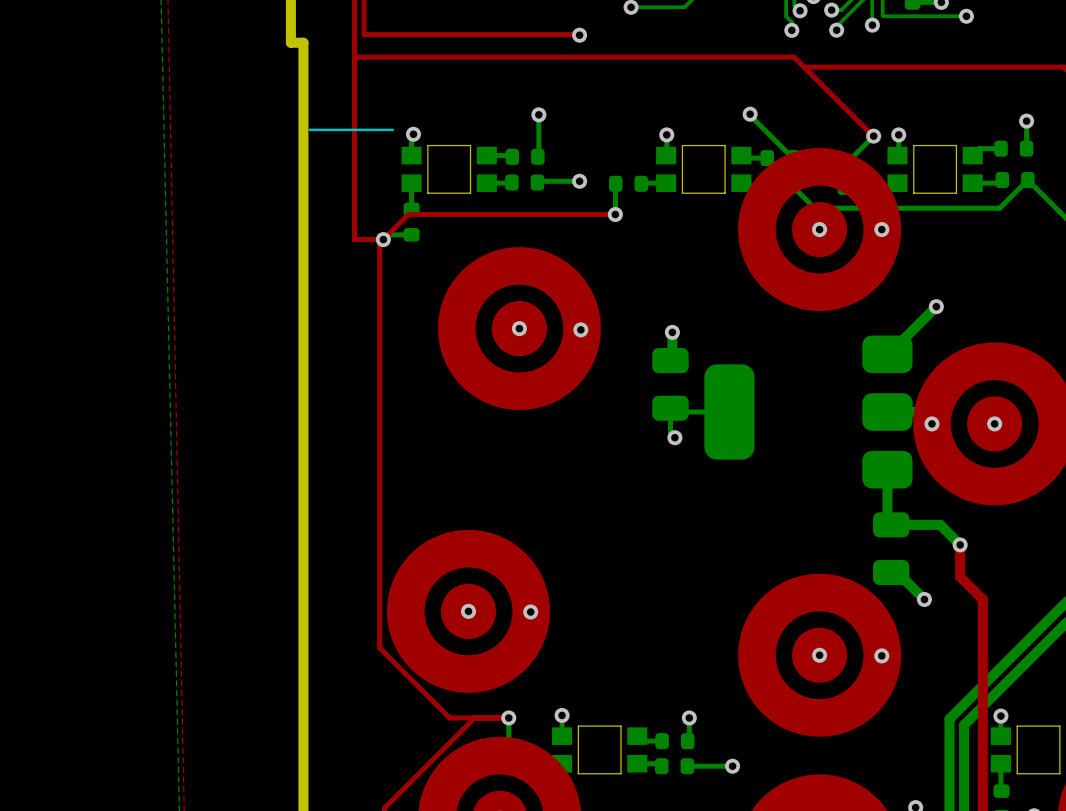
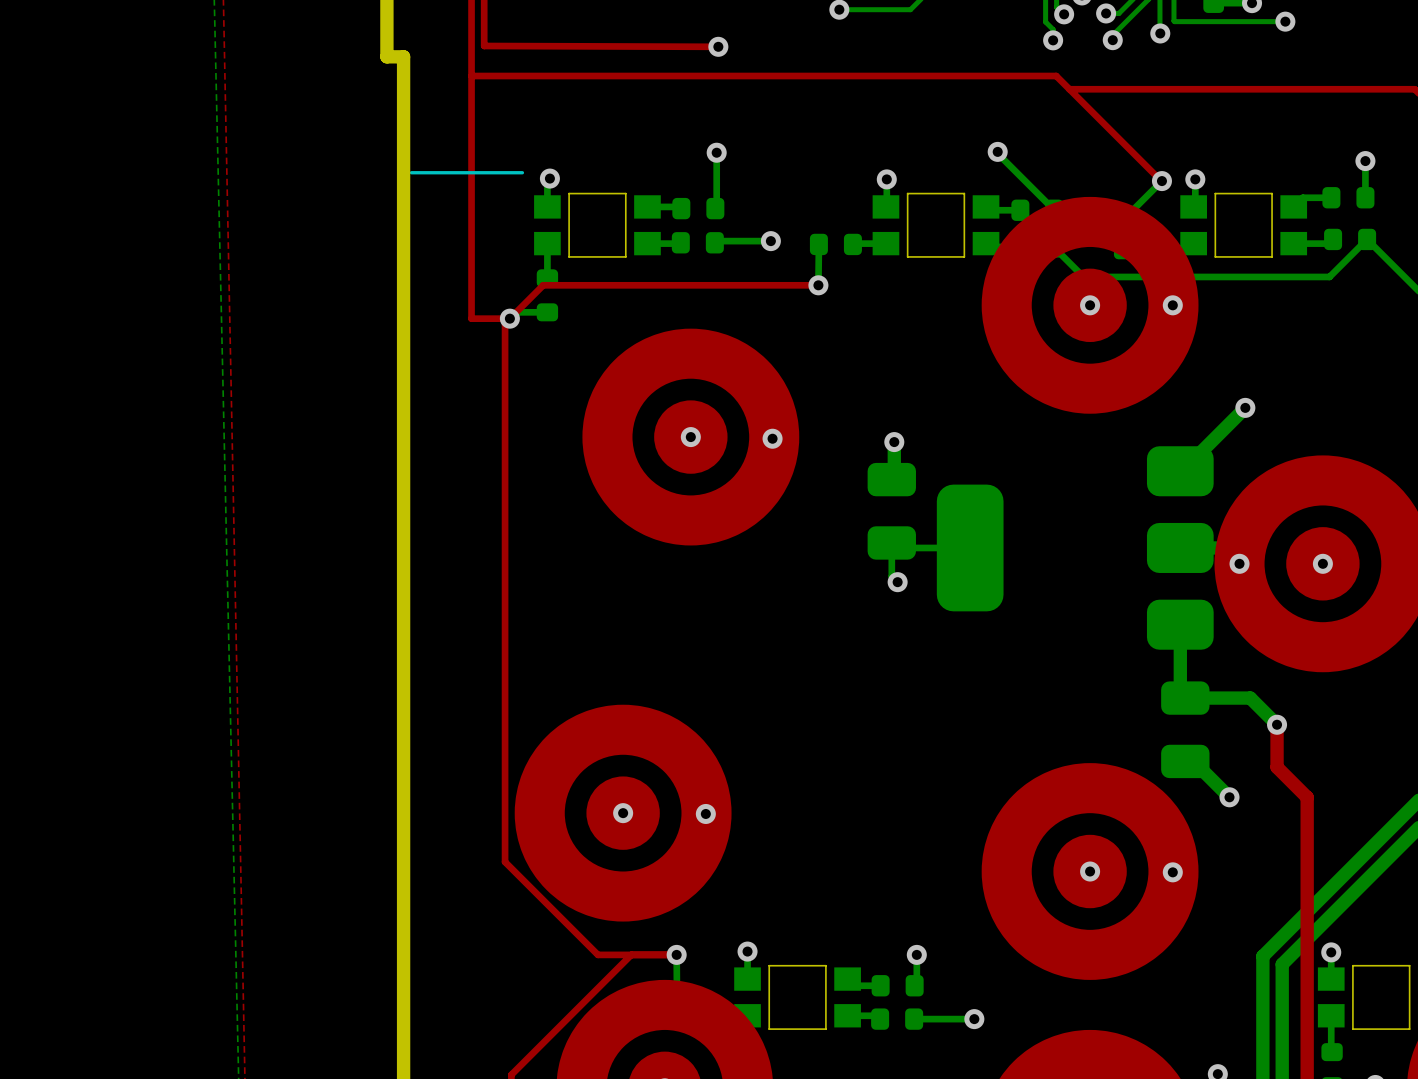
top track: (364, 34) (579, 35) -> (484, 45) (718, 46)
via position: (579, 35) -> (718, 46)

